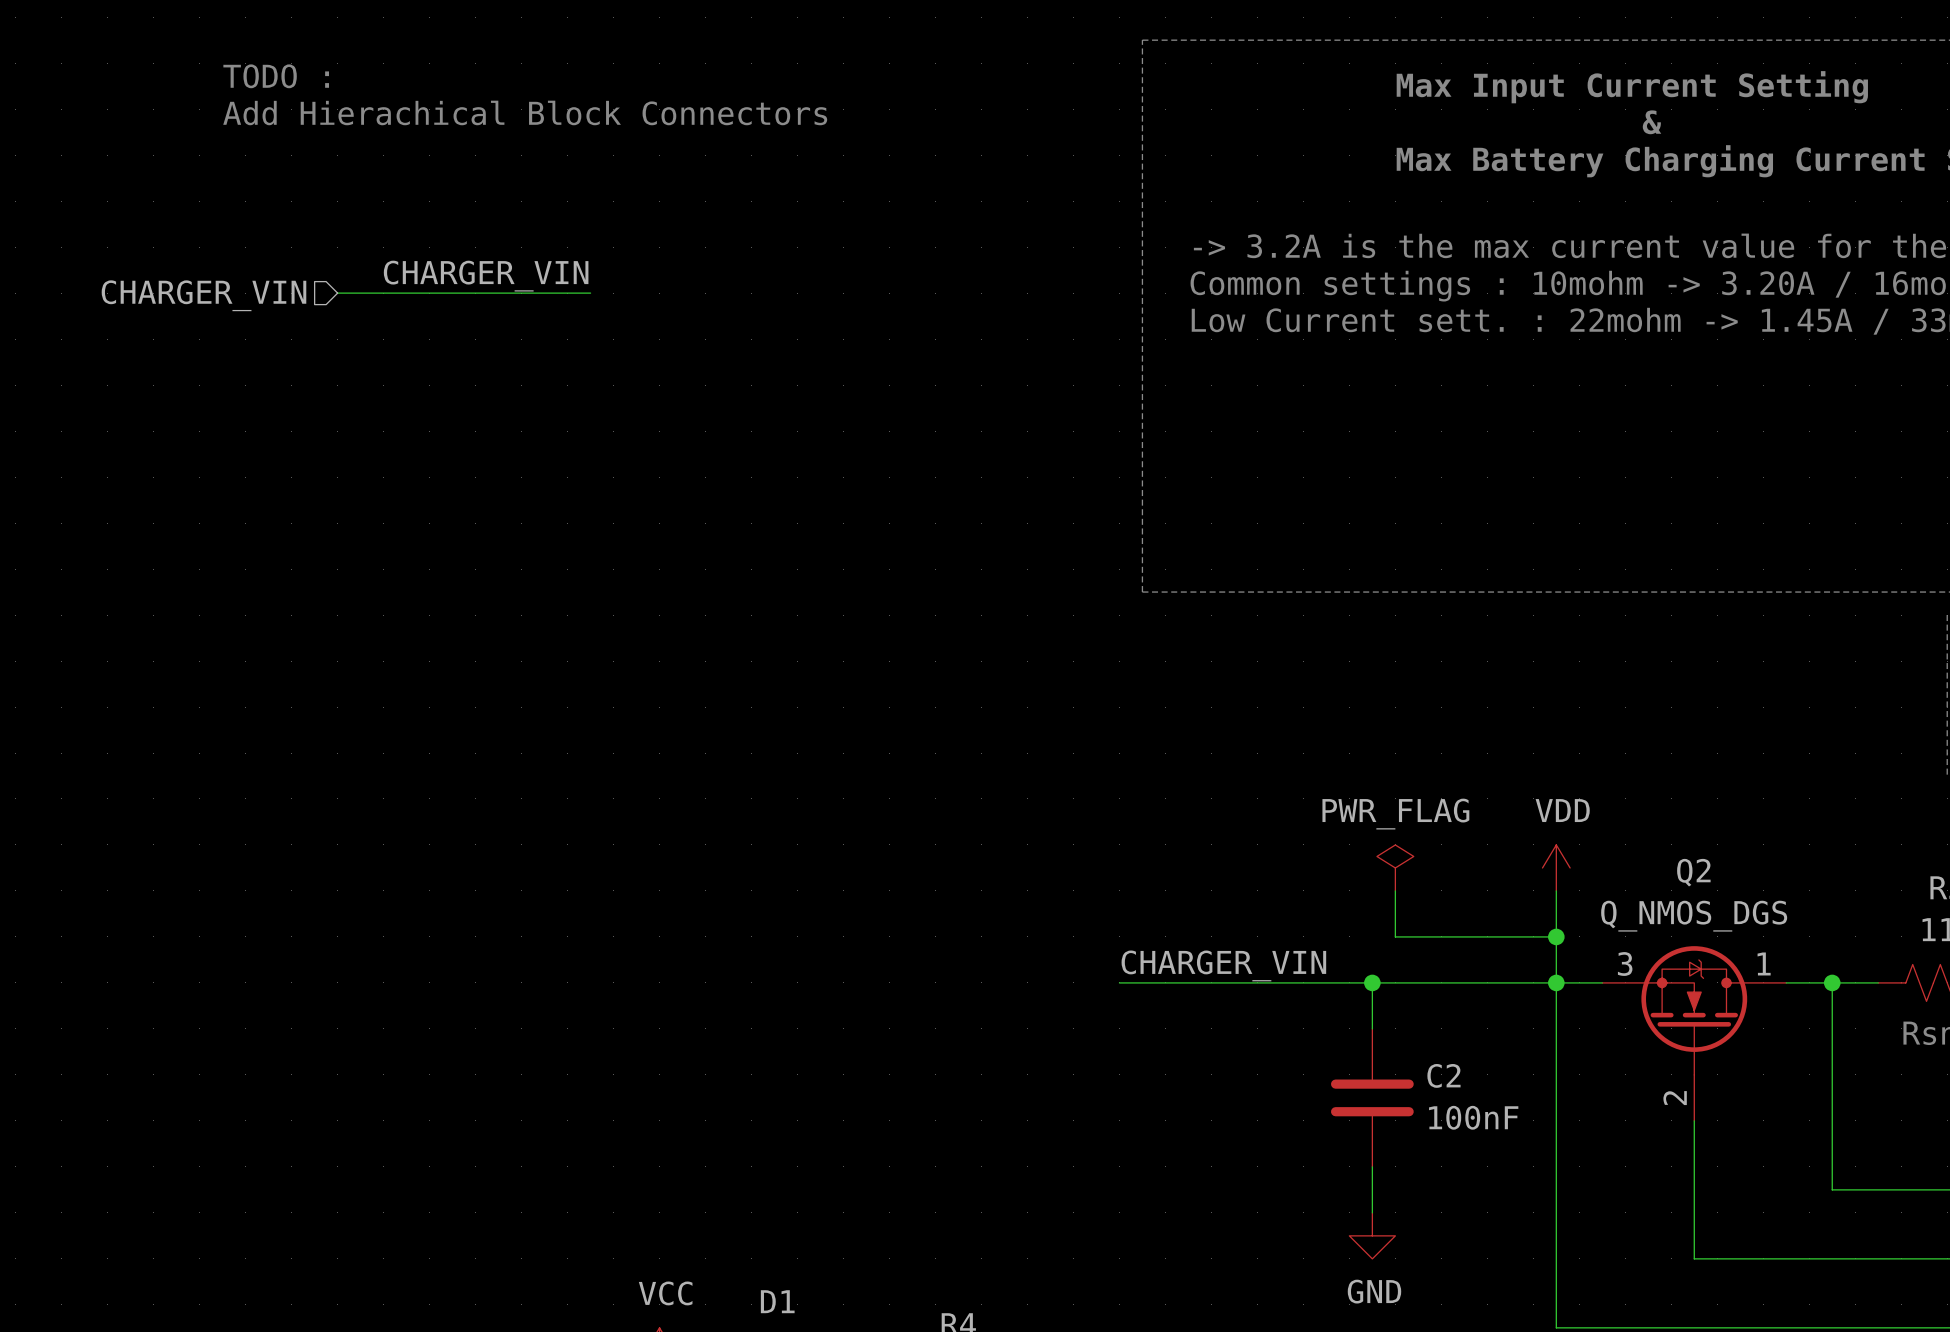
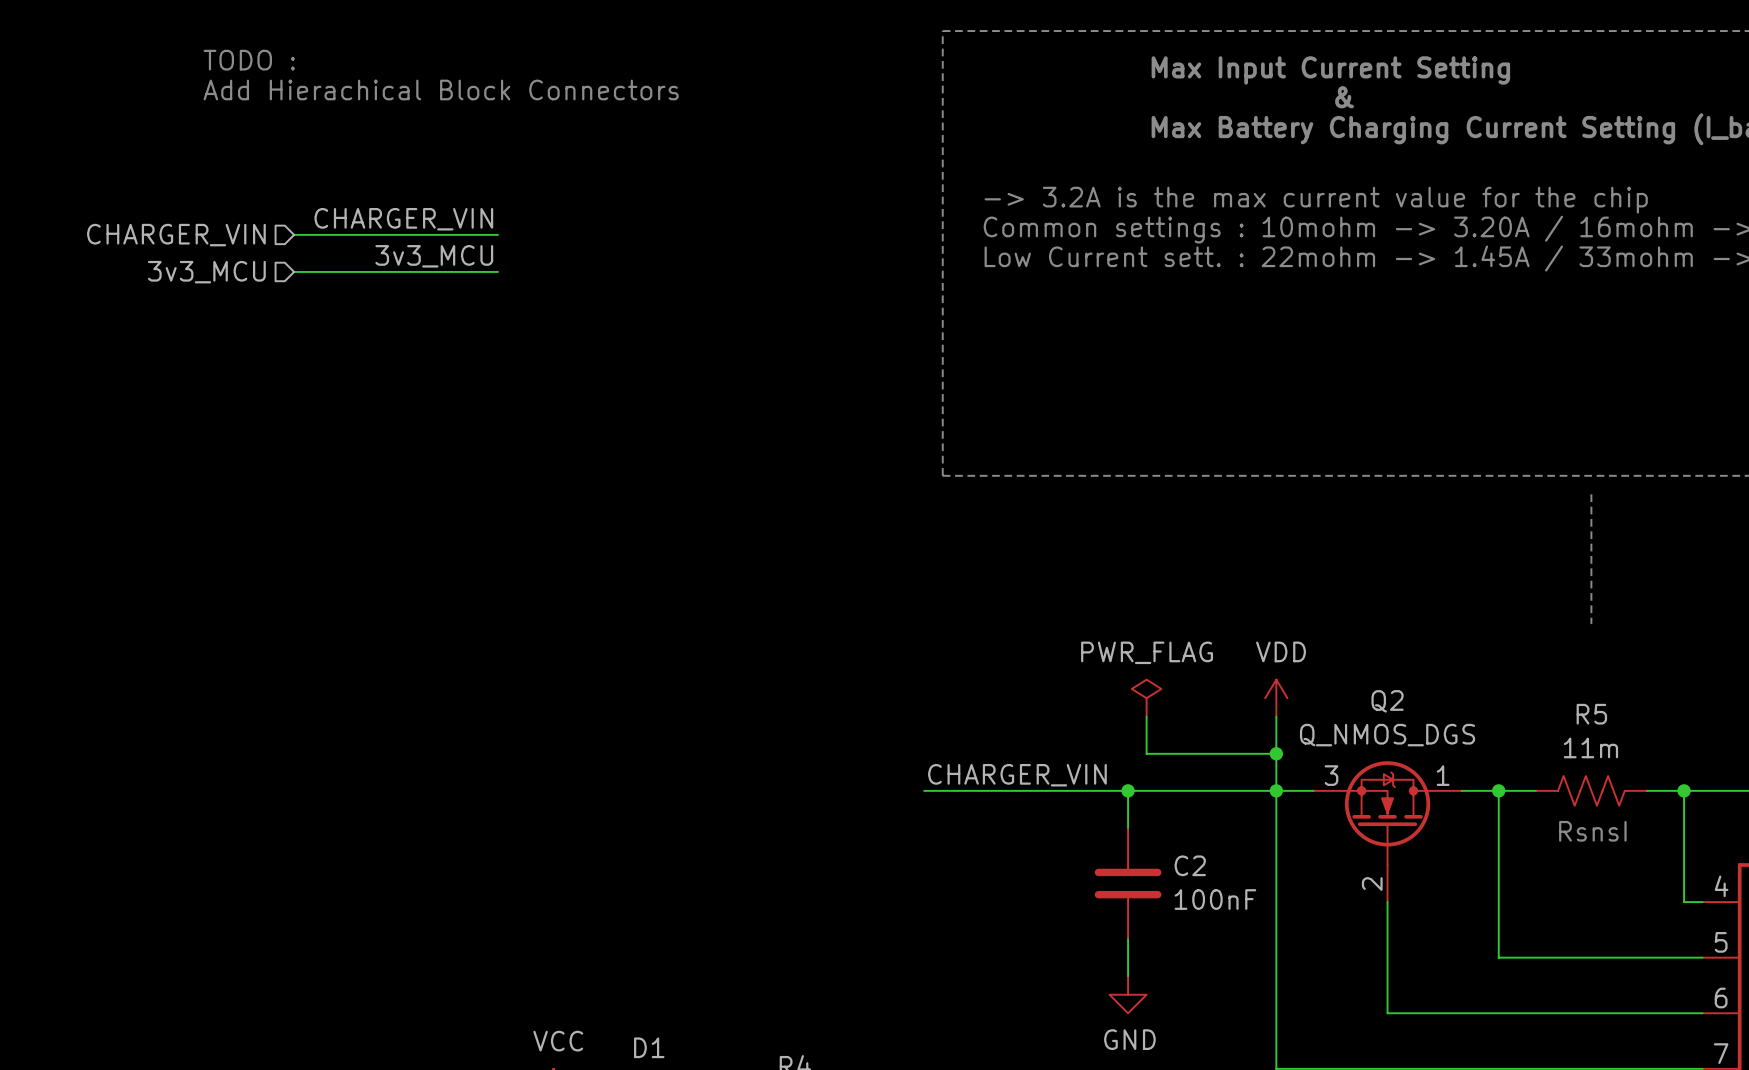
label: none -> 3v3_MCU (434, 256)
wire: none -> (294, 271) (497, 271)
hierarchical label: none -> 3v3_MCU (206, 272)

